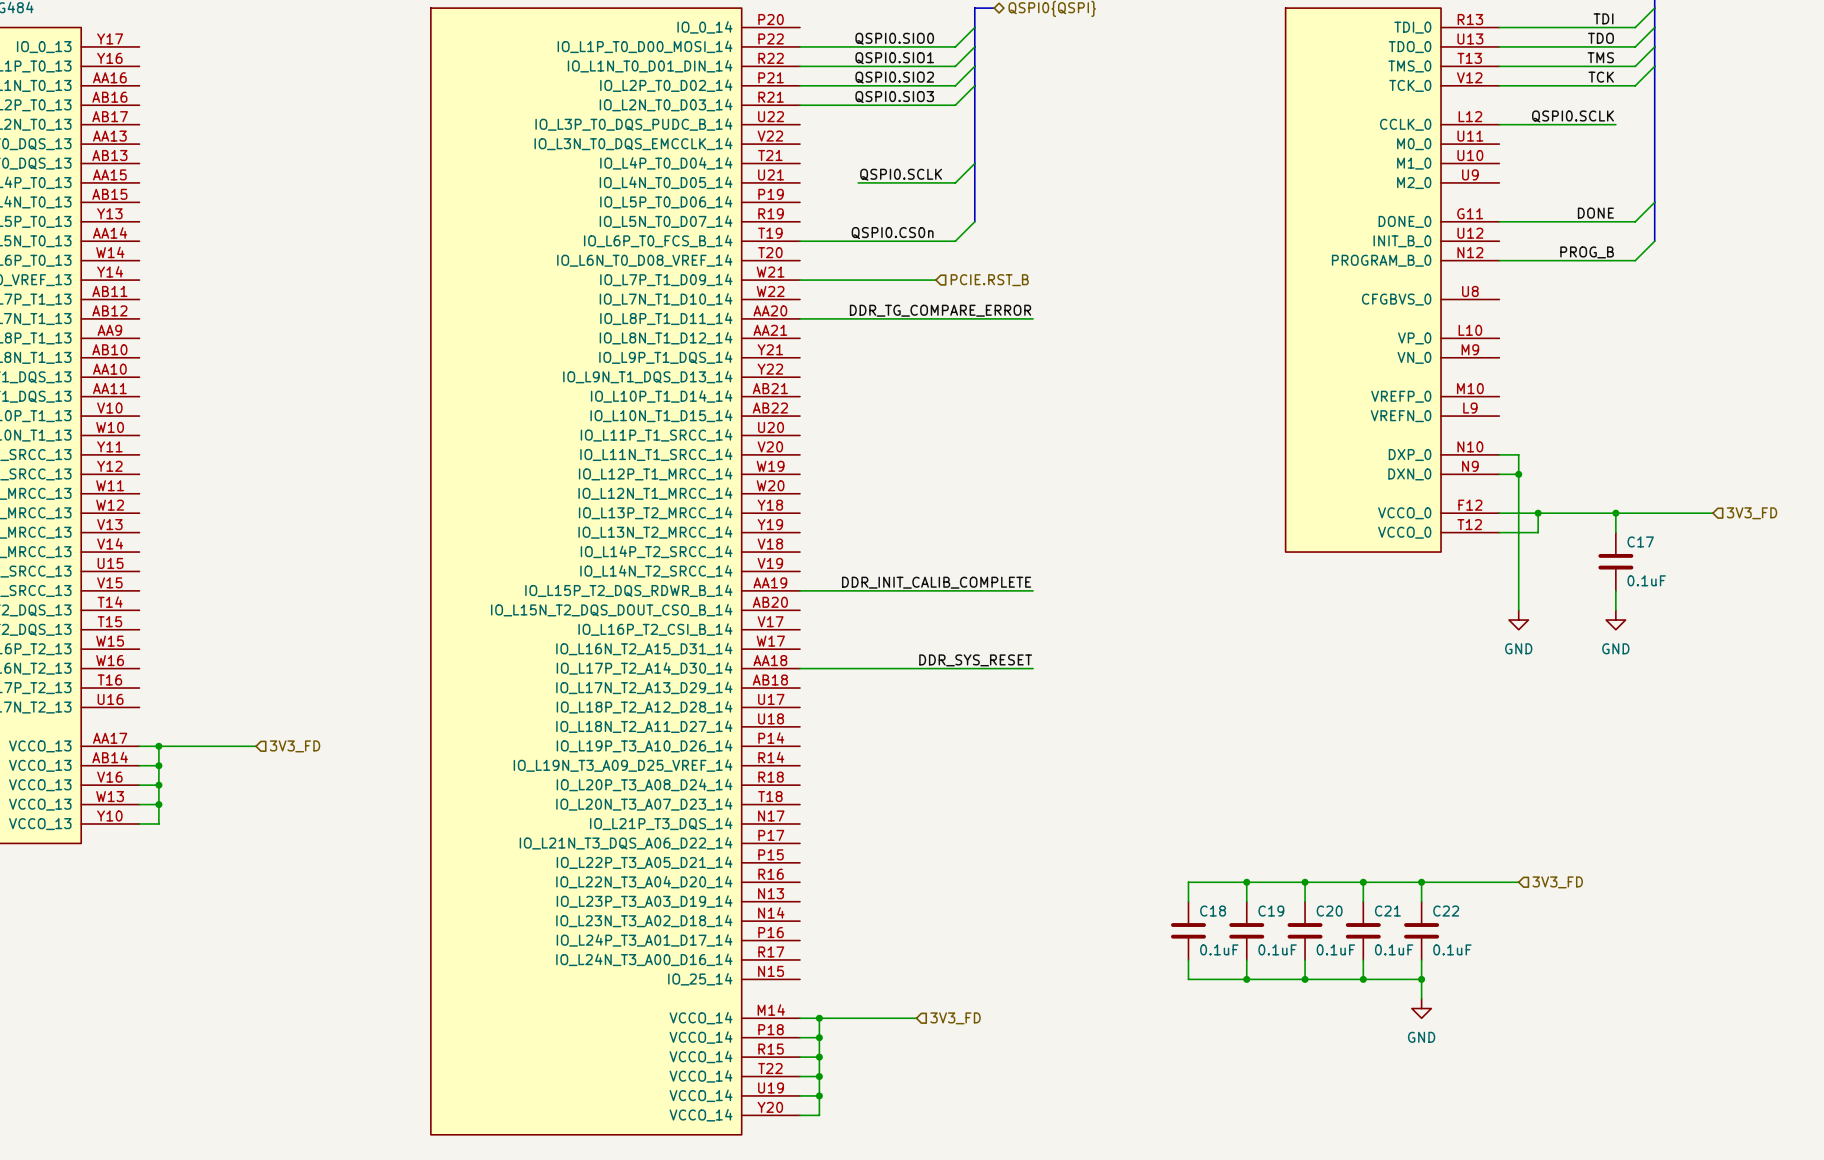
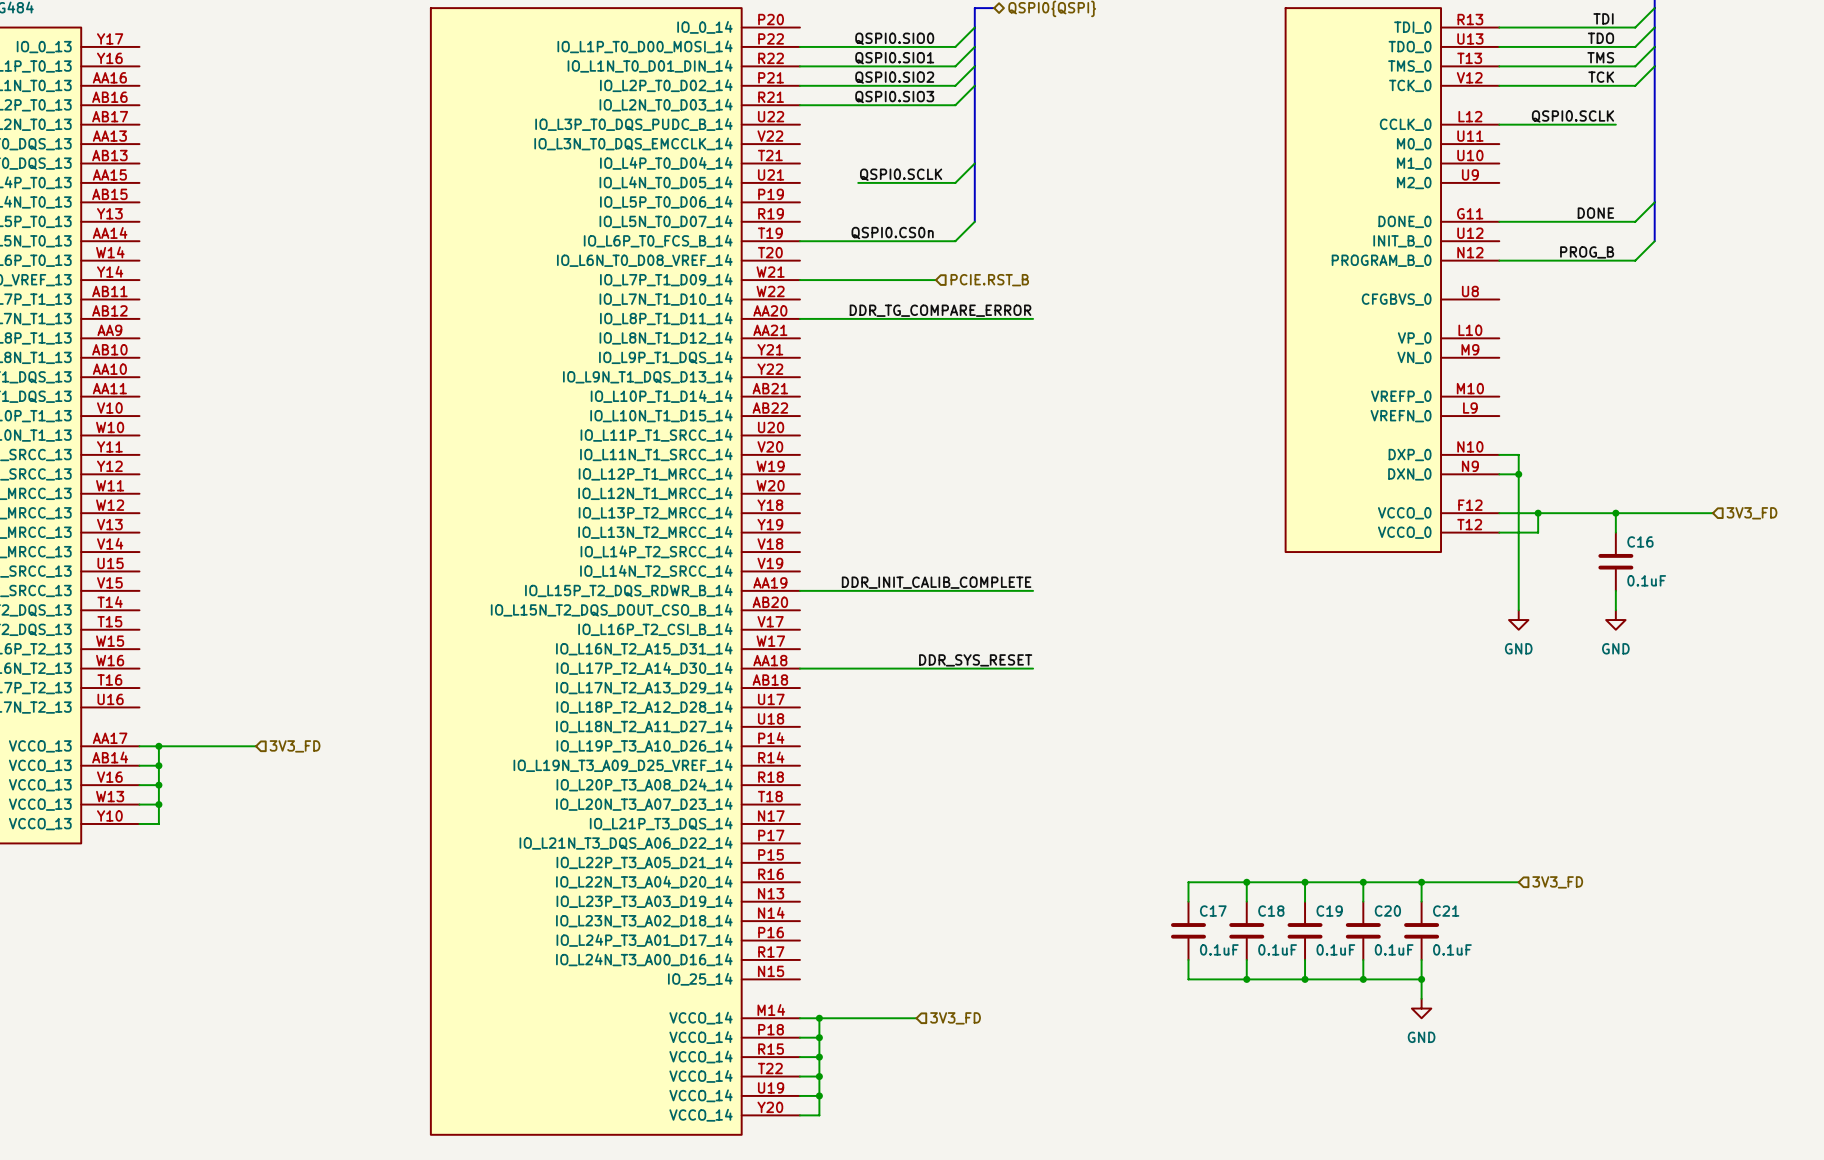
C17 name: C17 (1640, 541) -> C16 (1640, 541)
C18 name: C18 (1213, 911) -> C17 (1213, 911)
C19 name: C19 (1271, 911) -> C18 (1271, 911)
C20 name: C20 (1329, 911) -> C19 (1329, 911)
C21 name: C21 (1387, 911) -> C20 (1387, 911)
C22 name: C22 (1446, 911) -> C21 (1446, 911)

